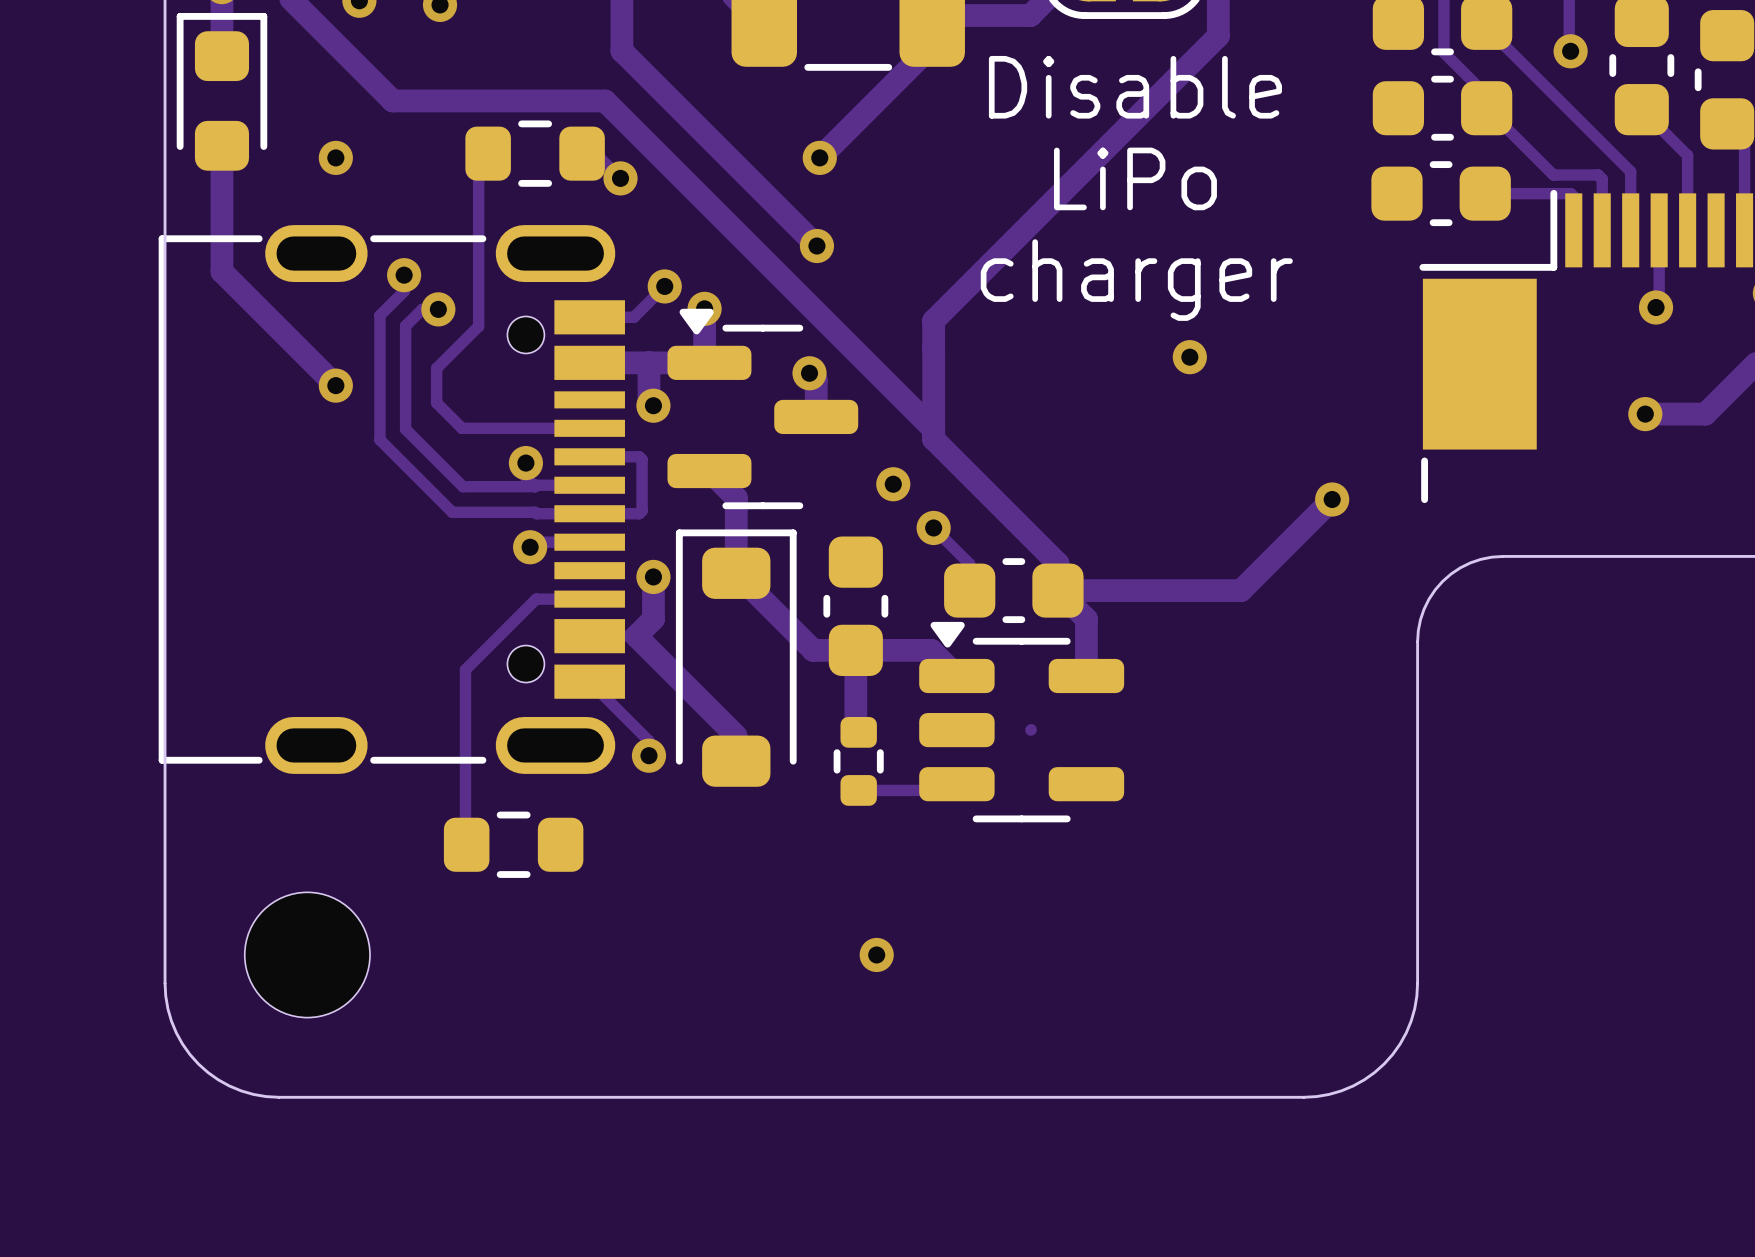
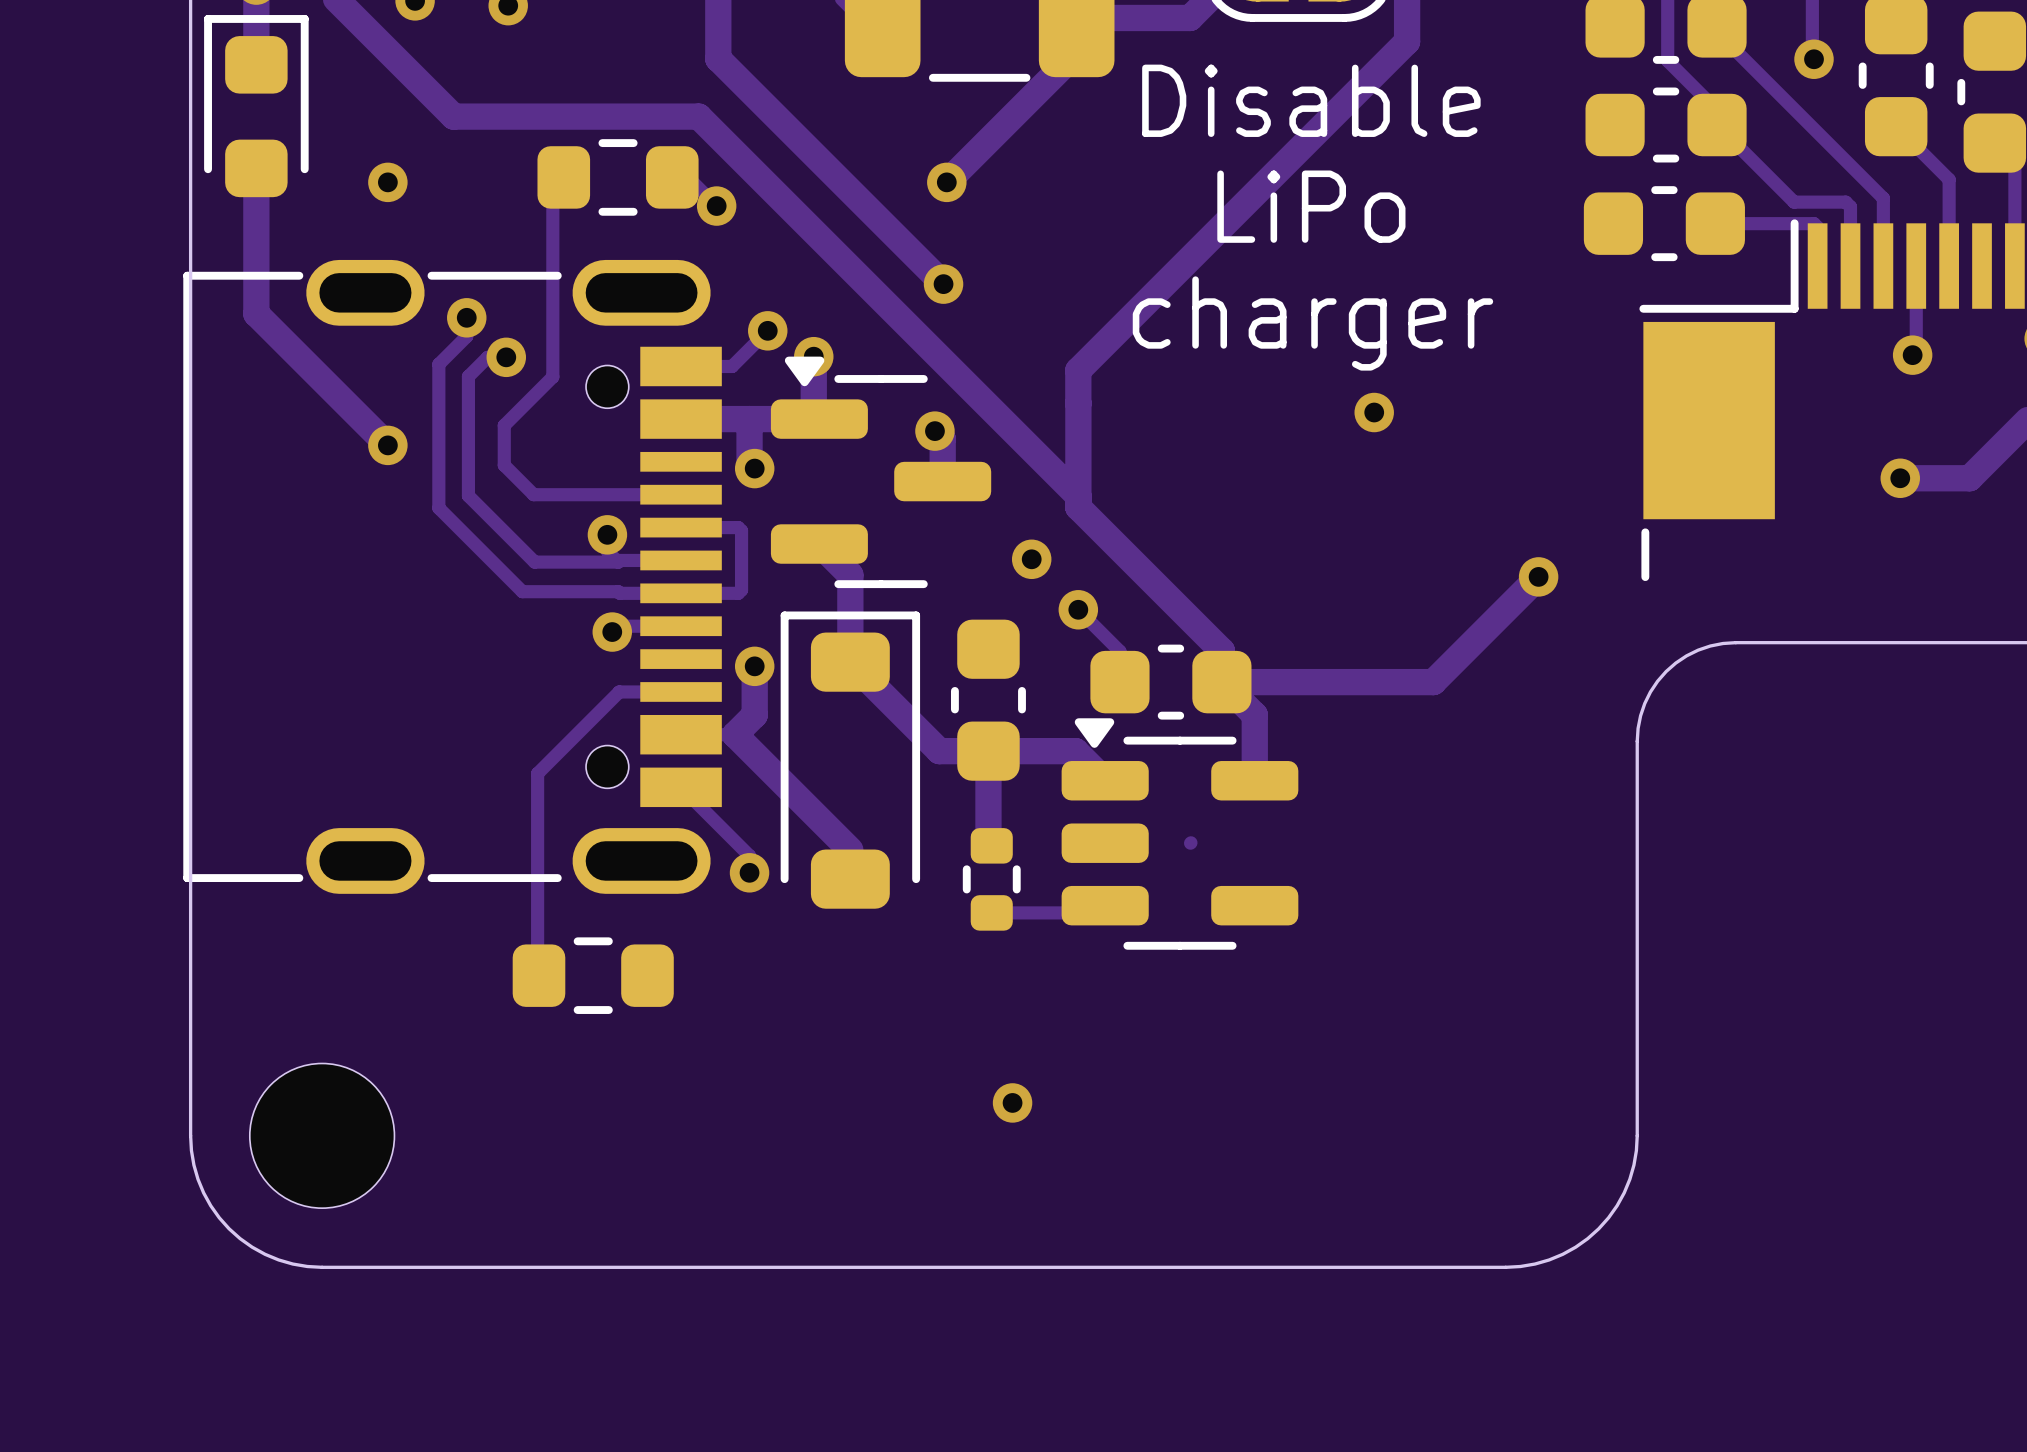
part position: (307, 954) -> (322, 1135)

